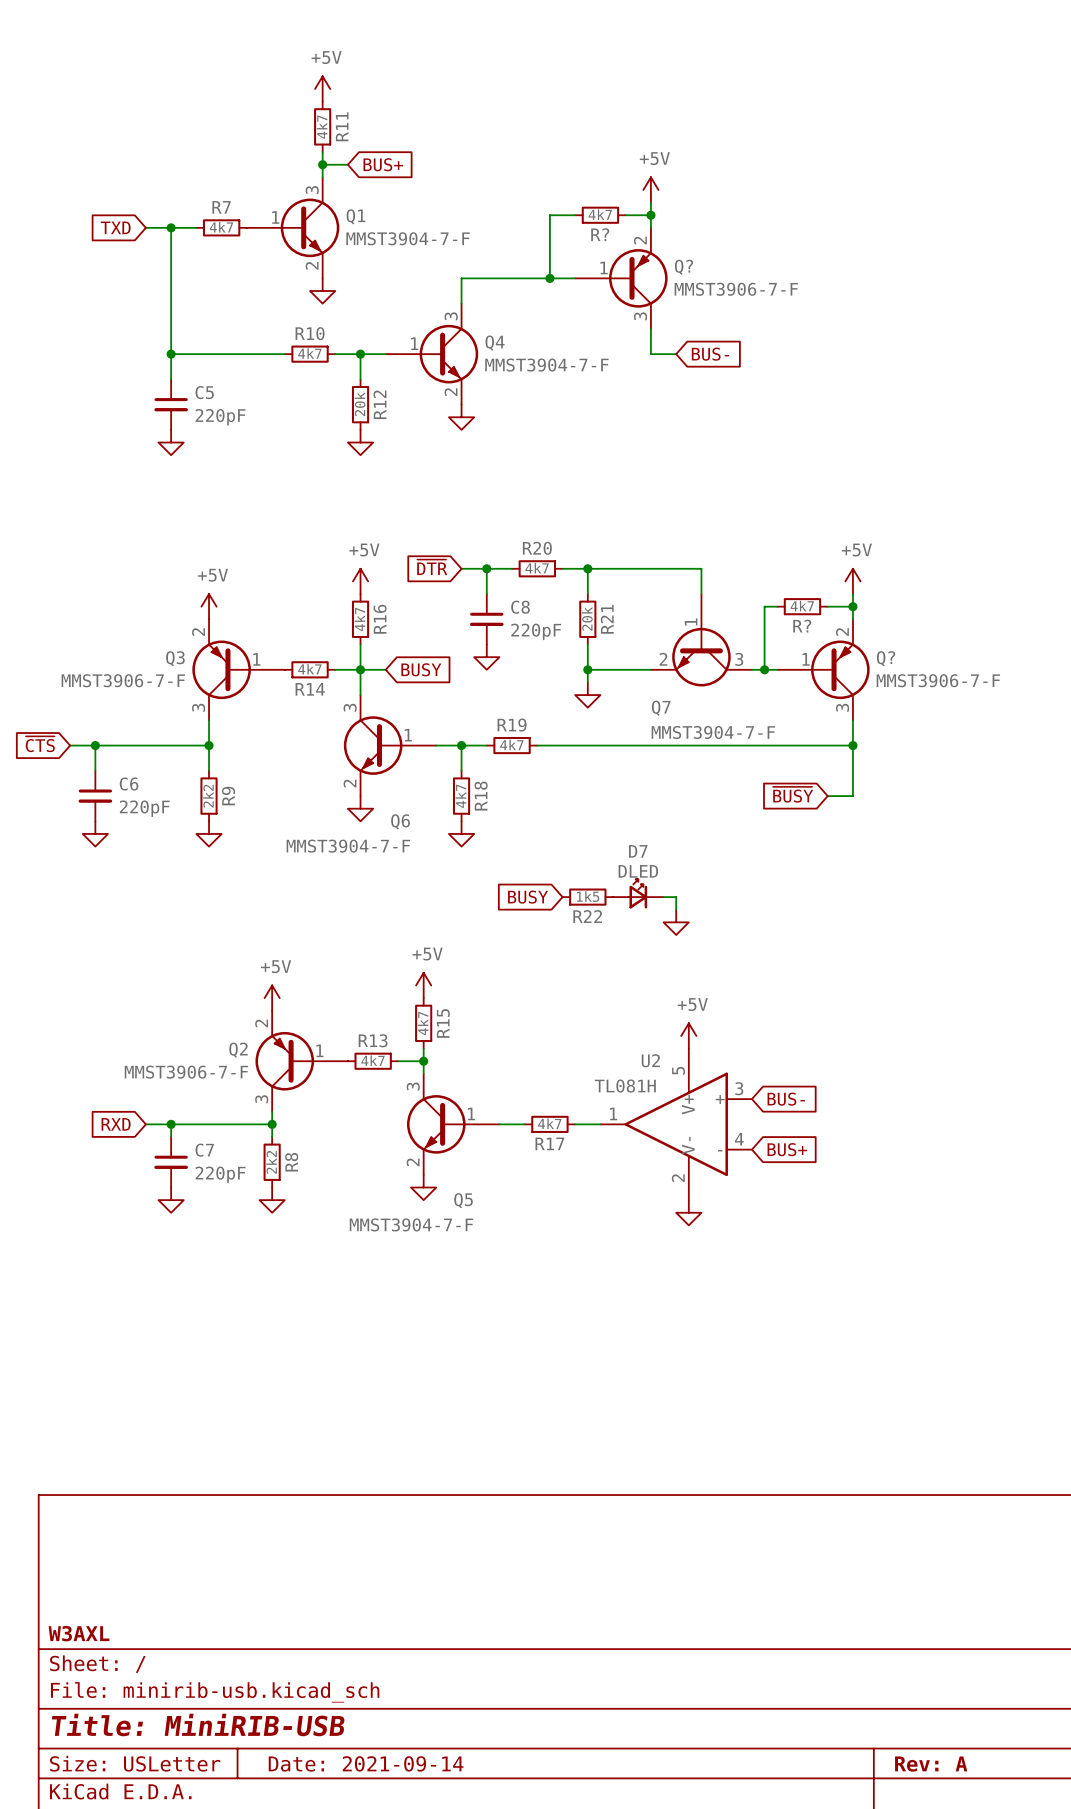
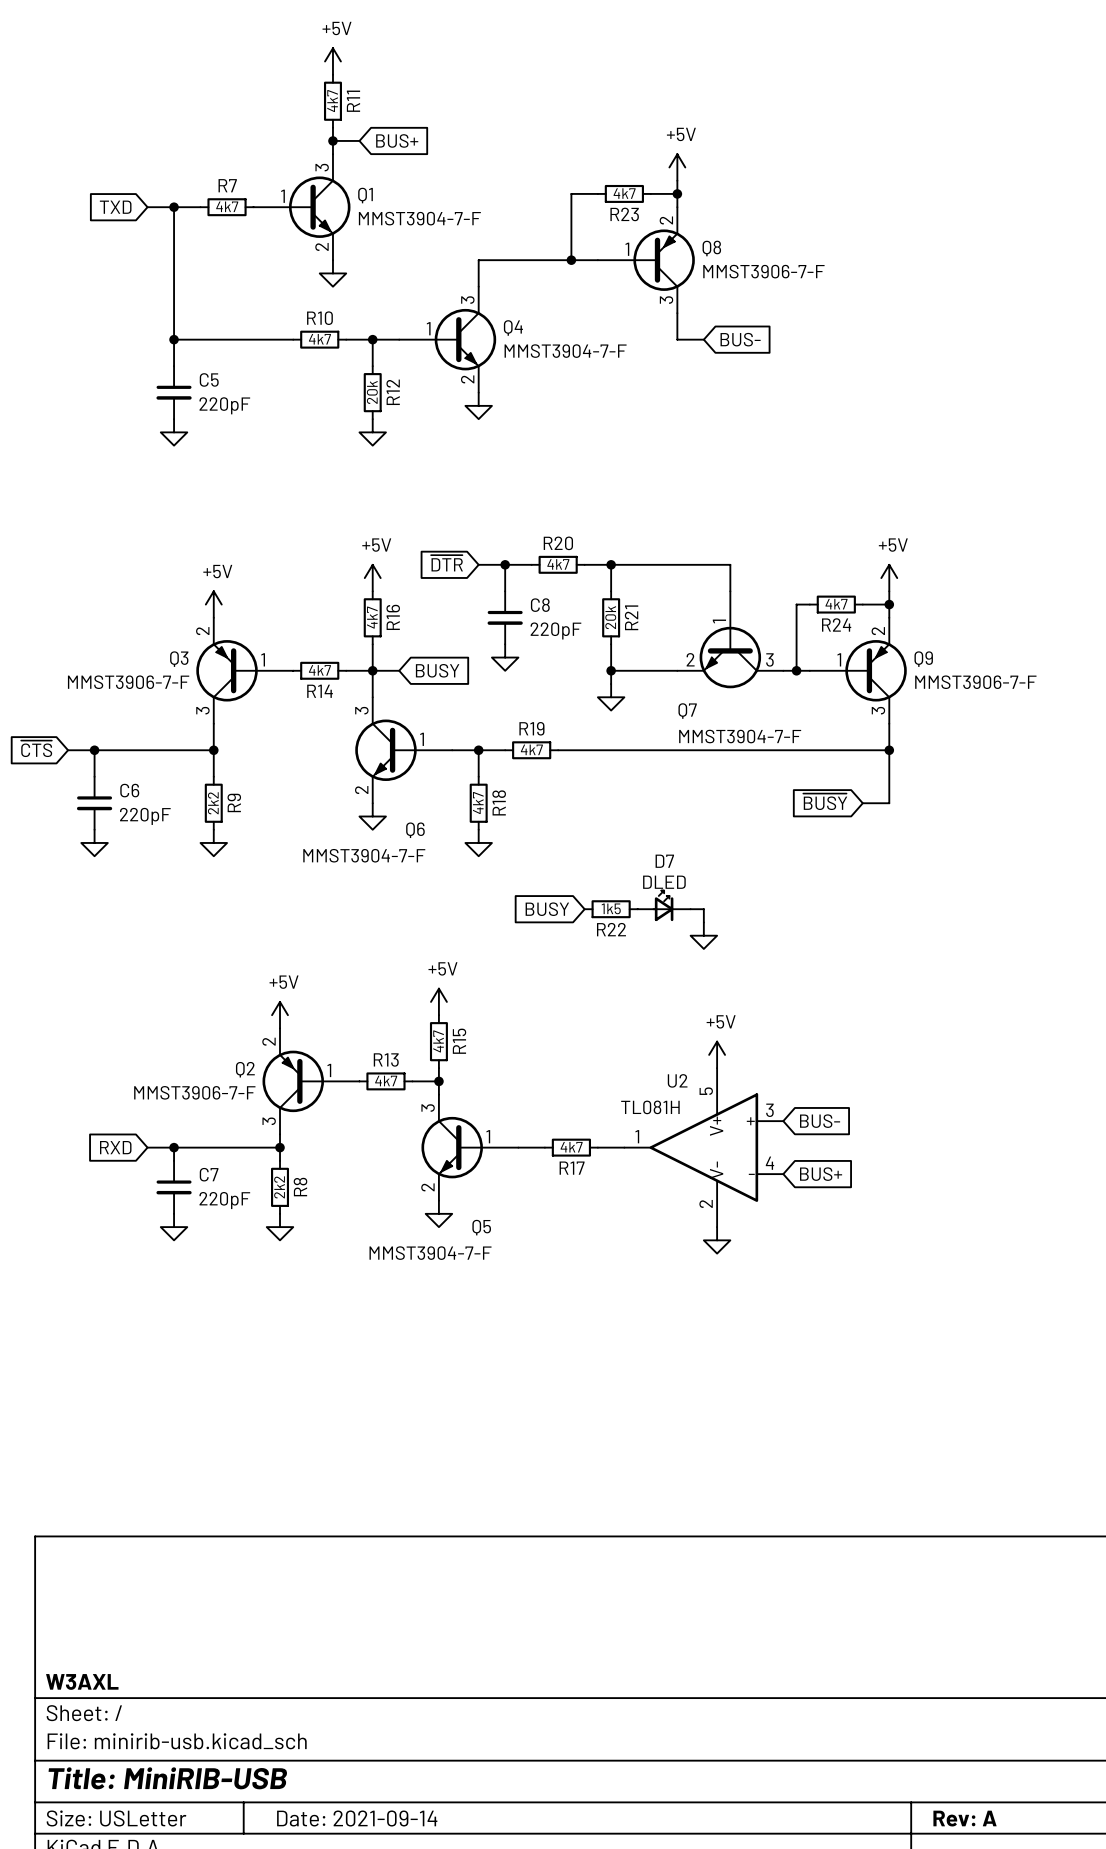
R? name: R? (600, 234) -> R23 (624, 214)
Q? name: Q? (684, 267) -> Q8 (711, 248)
R? name: R? (802, 626) -> R24 (836, 624)
Q? name: Q? (886, 658) -> Q9 (923, 659)

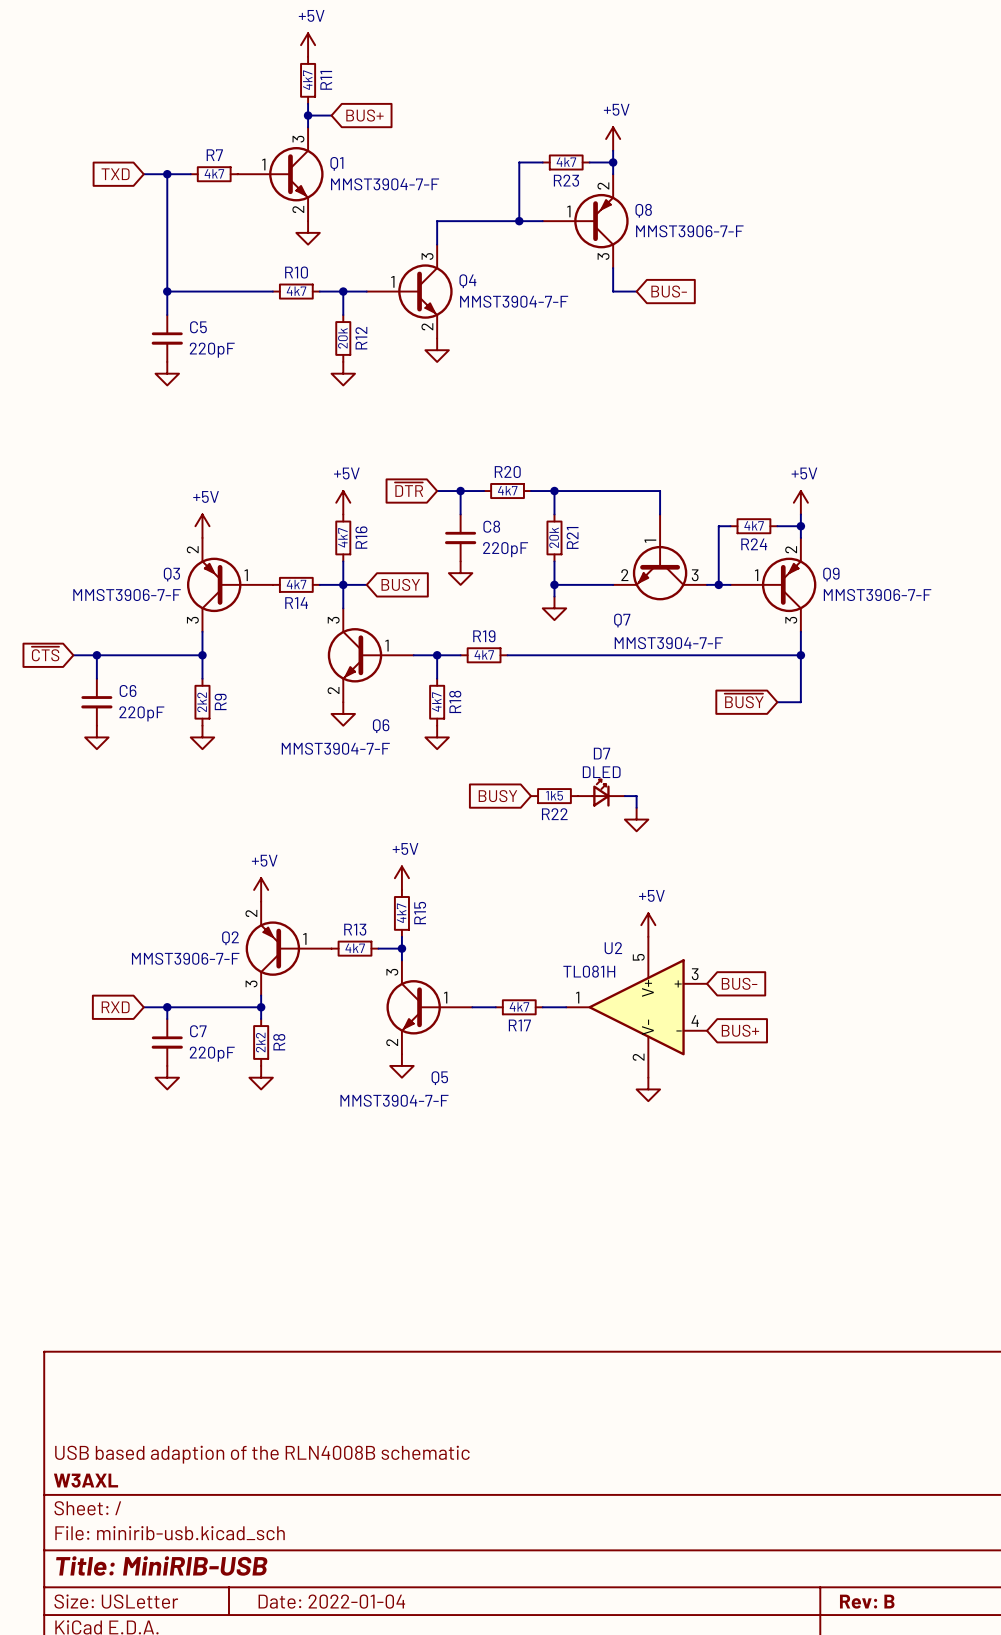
title block: none -> USB based adaption of the RLN4008B schematic (262, 1454)
title block: Date: 2021-09-14 (357, 1818) -> Date: 2022-01-04 (331, 1601)
title block: Rev: A (965, 1818) -> Rev: B (867, 1601)

